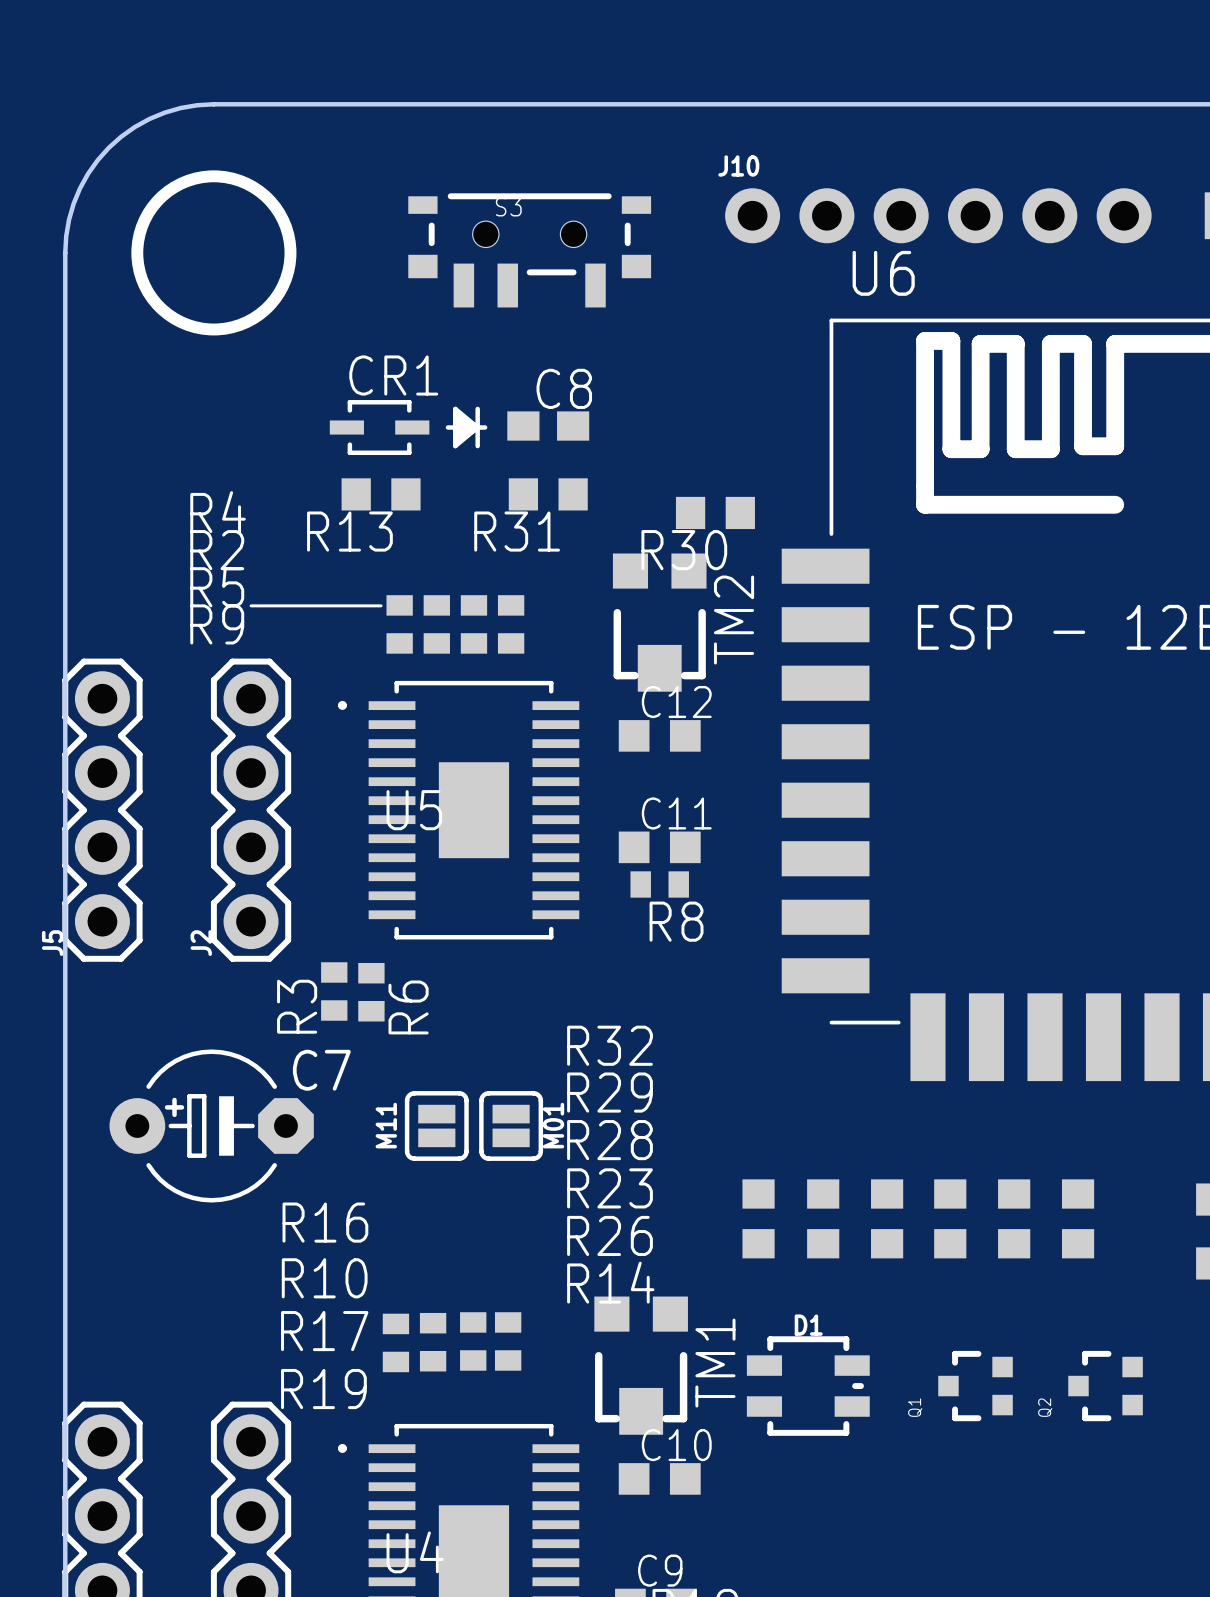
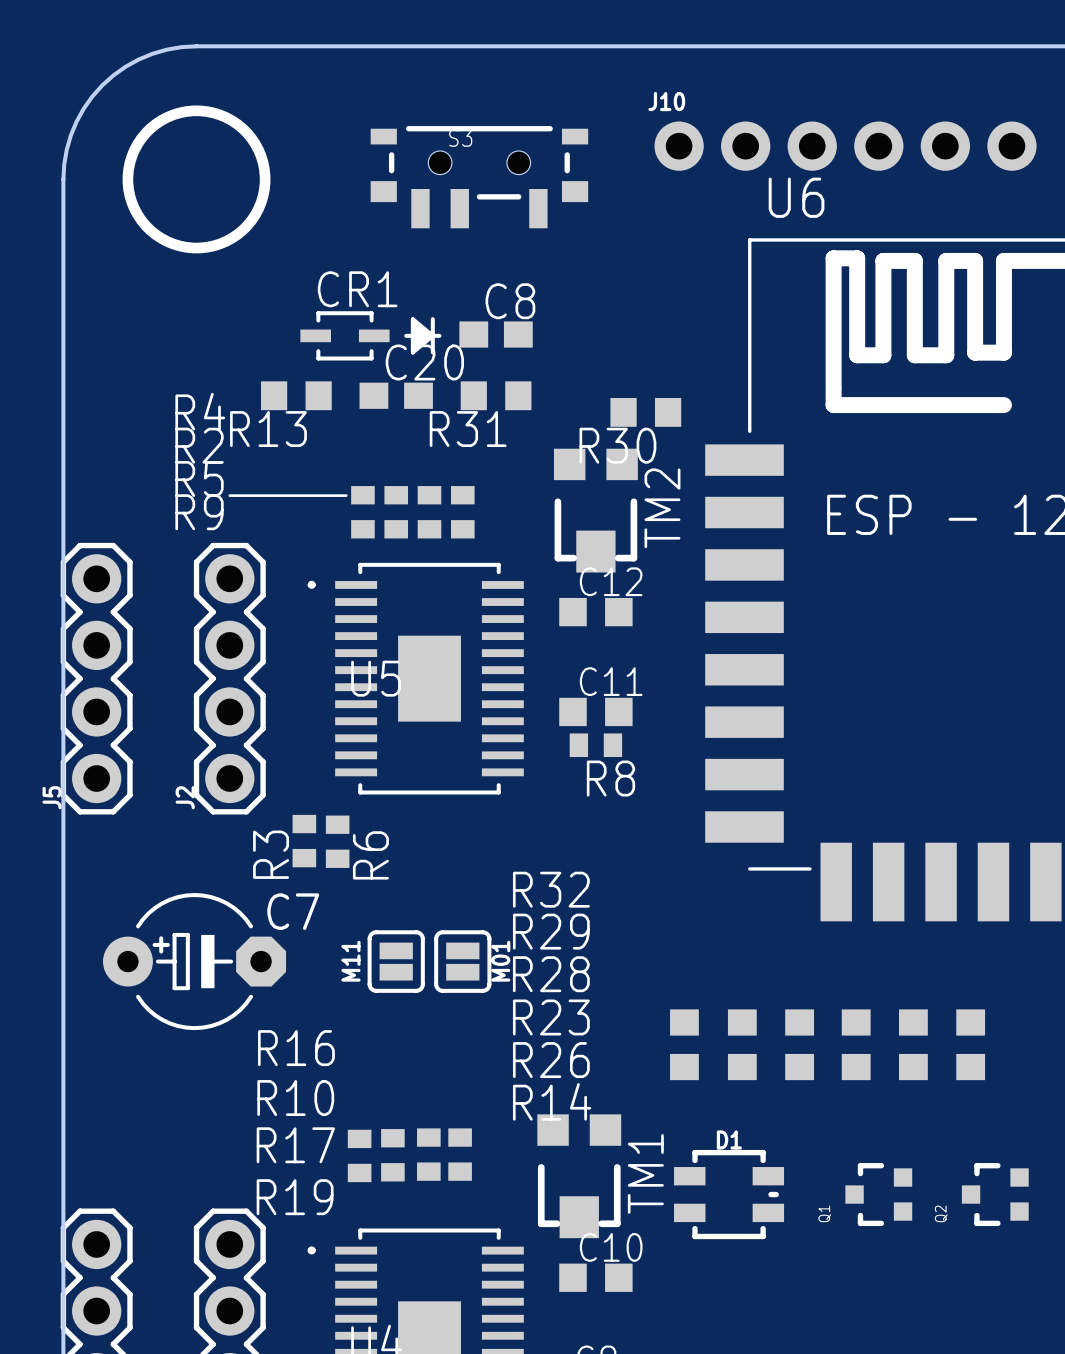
R13 position: (381, 494) -> (296, 395)
C20: none -> (396, 395)

